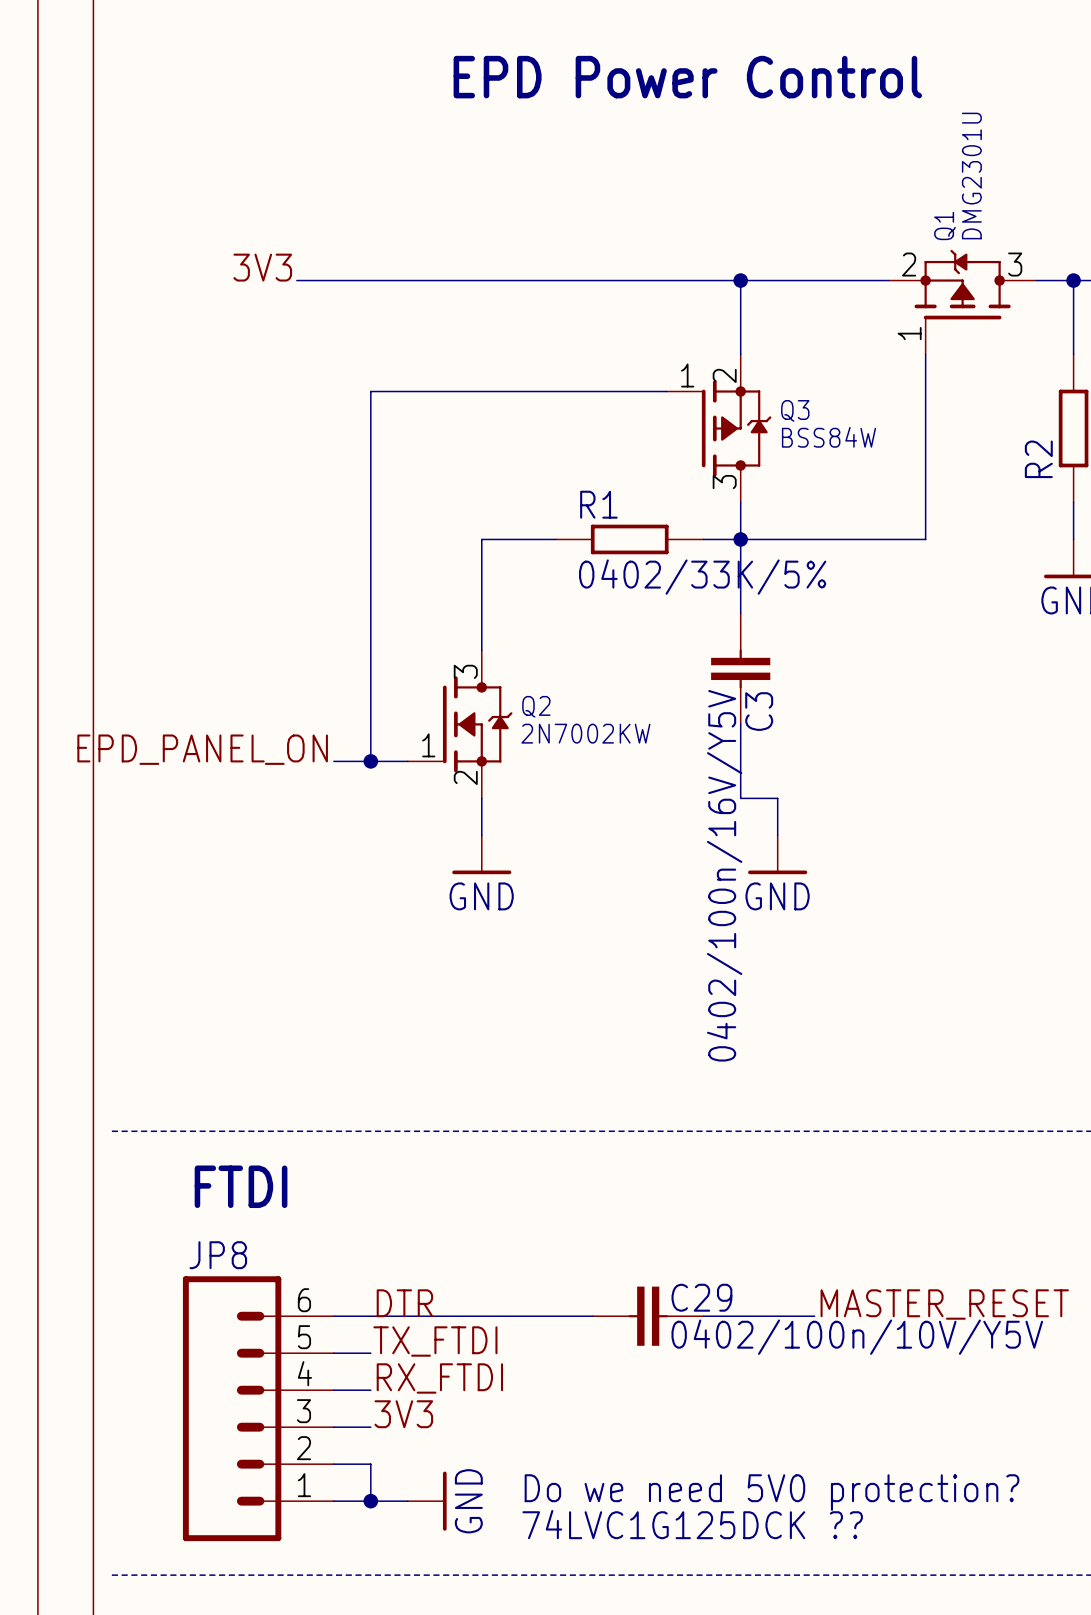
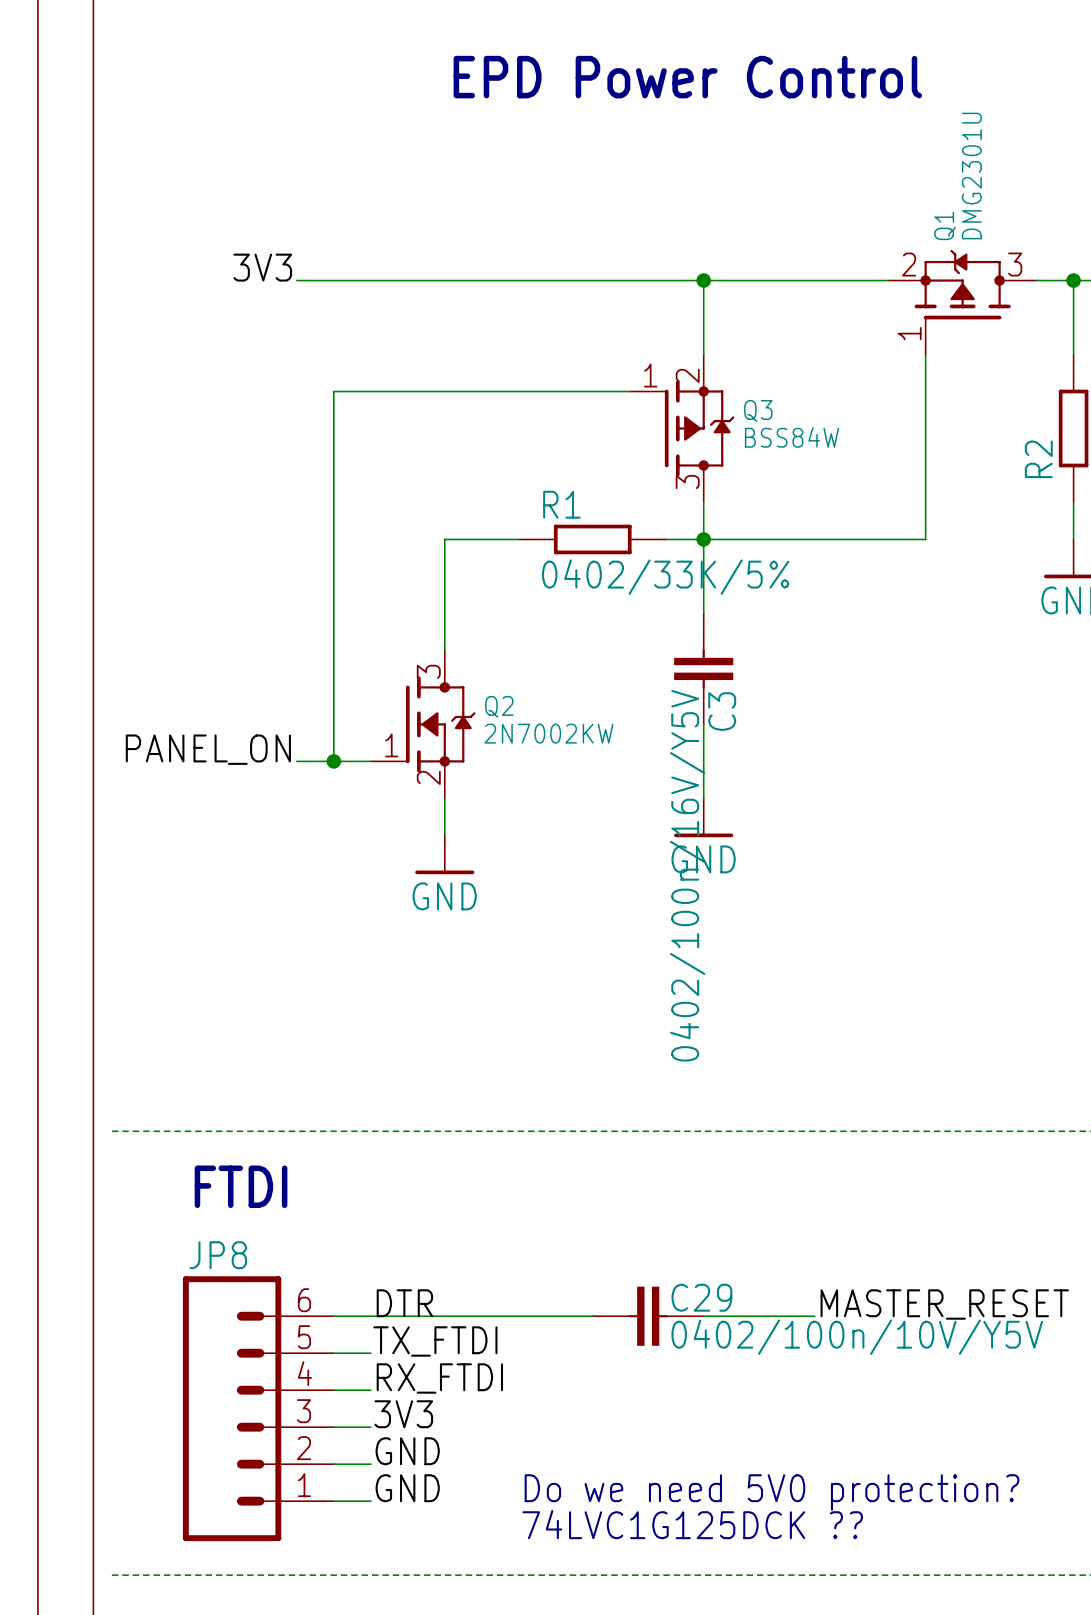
wire: (740, 280) (740, 354) -> (703, 280) (703, 354)
junction position: (740, 280) -> (703, 280)
wire: (370, 391) (370, 761) (407, 761) -> (370, 391) (333, 391) (333, 761) (296, 761)
Q3 position: (719, 428) -> (682, 428)
wire: (740, 502) (740, 613) -> (703, 502) (703, 613)
wire: (481, 539) (481, 650) -> (481, 539) (444, 539) (444, 650)
R1 position: (629, 539) -> (592, 539)
junction position: (740, 539) -> (703, 539)
C3 position: (740, 668) -> (703, 668)
Q2 position: (460, 724) -> (423, 724)
wire: none -> (703, 724) (703, 798)
wire: (740, 724) (740, 798) (777, 798) (777, 835) -> none
label: EPD_PANEL_ON (202, 749) -> PANEL_ON (208, 749)
junction position: (370, 761) -> (333, 761)
wire: (481, 798) (481, 835) -> (444, 798) (444, 835)
power symbol position: GND (481, 854) -> GND (444, 854)
power symbol position: GND (777, 854) -> GND (703, 817)
label: none -> GND (407, 1451)
wire: (370, 1464) (370, 1501) (407, 1501) -> none
label: none -> GND (407, 1488)
junction: (370, 1501) -> none
power symbol: GND (427, 1501) -> none

